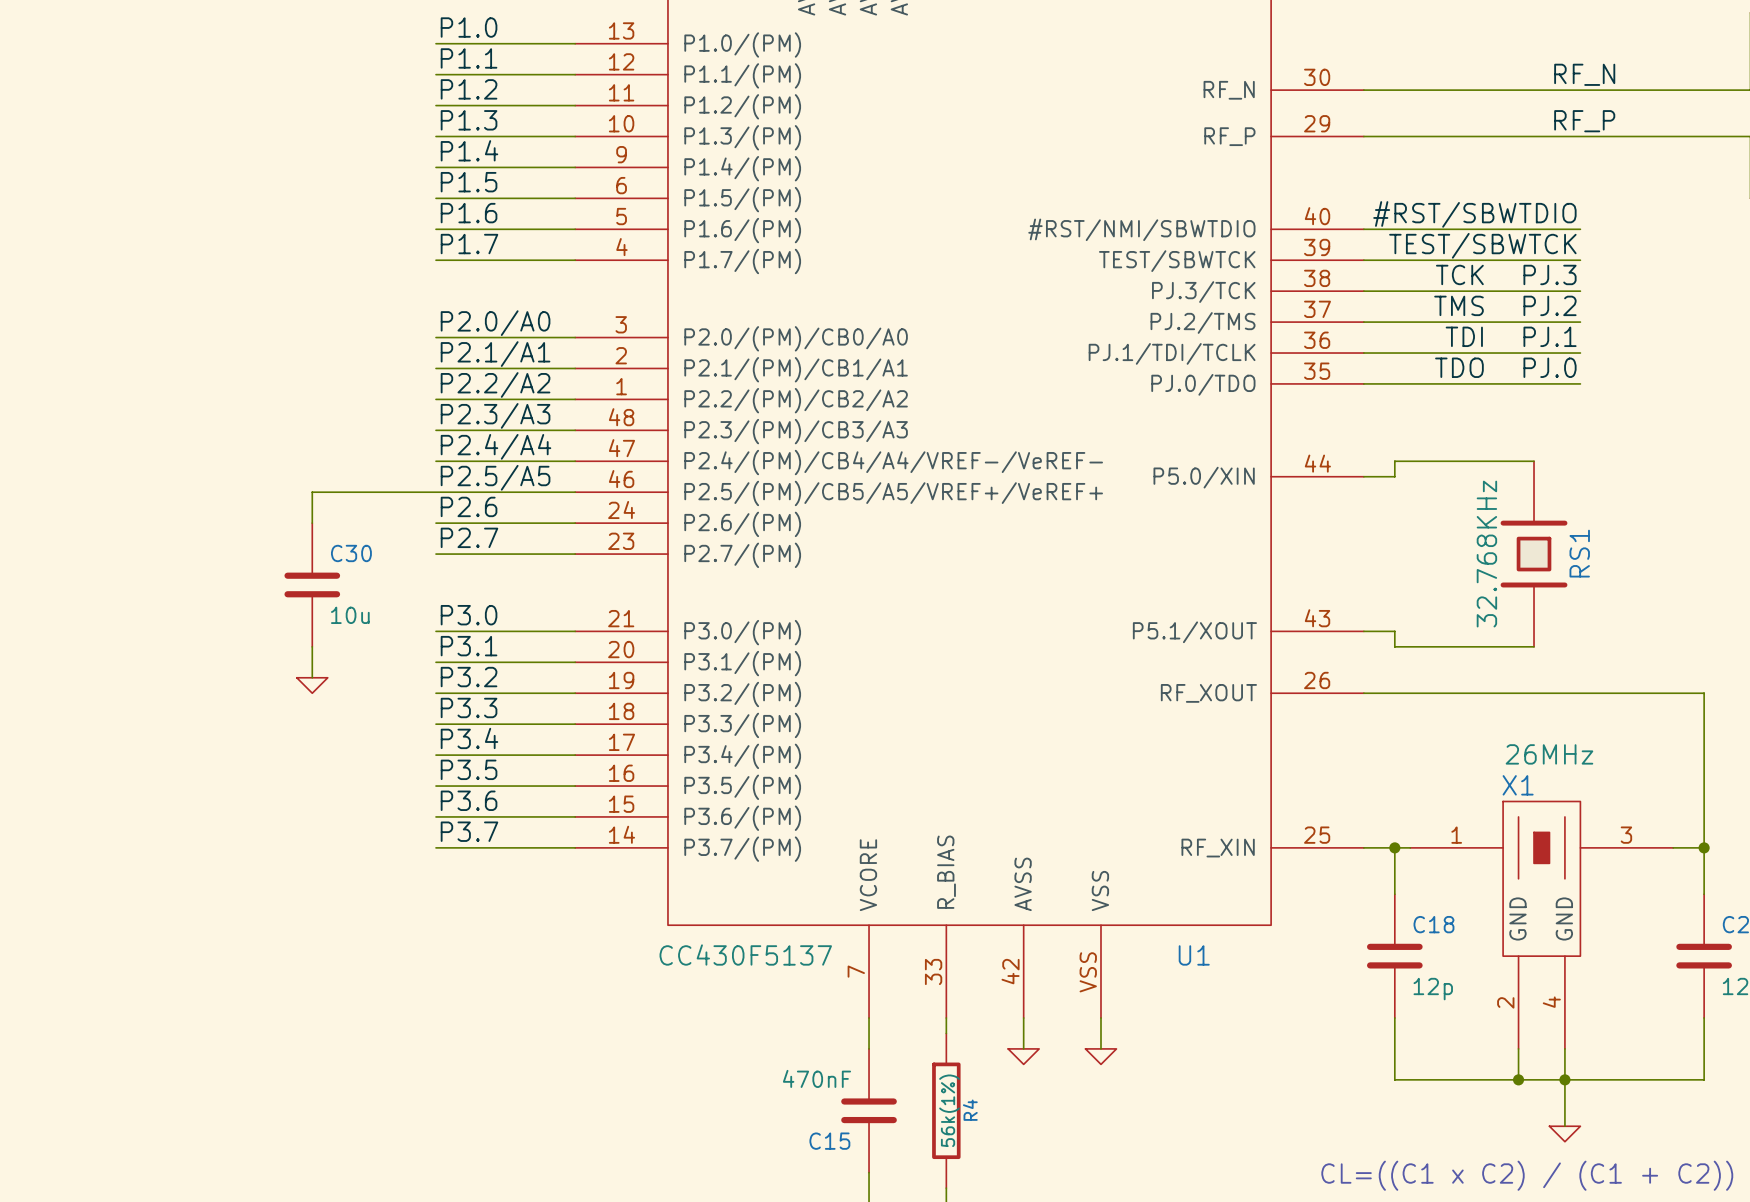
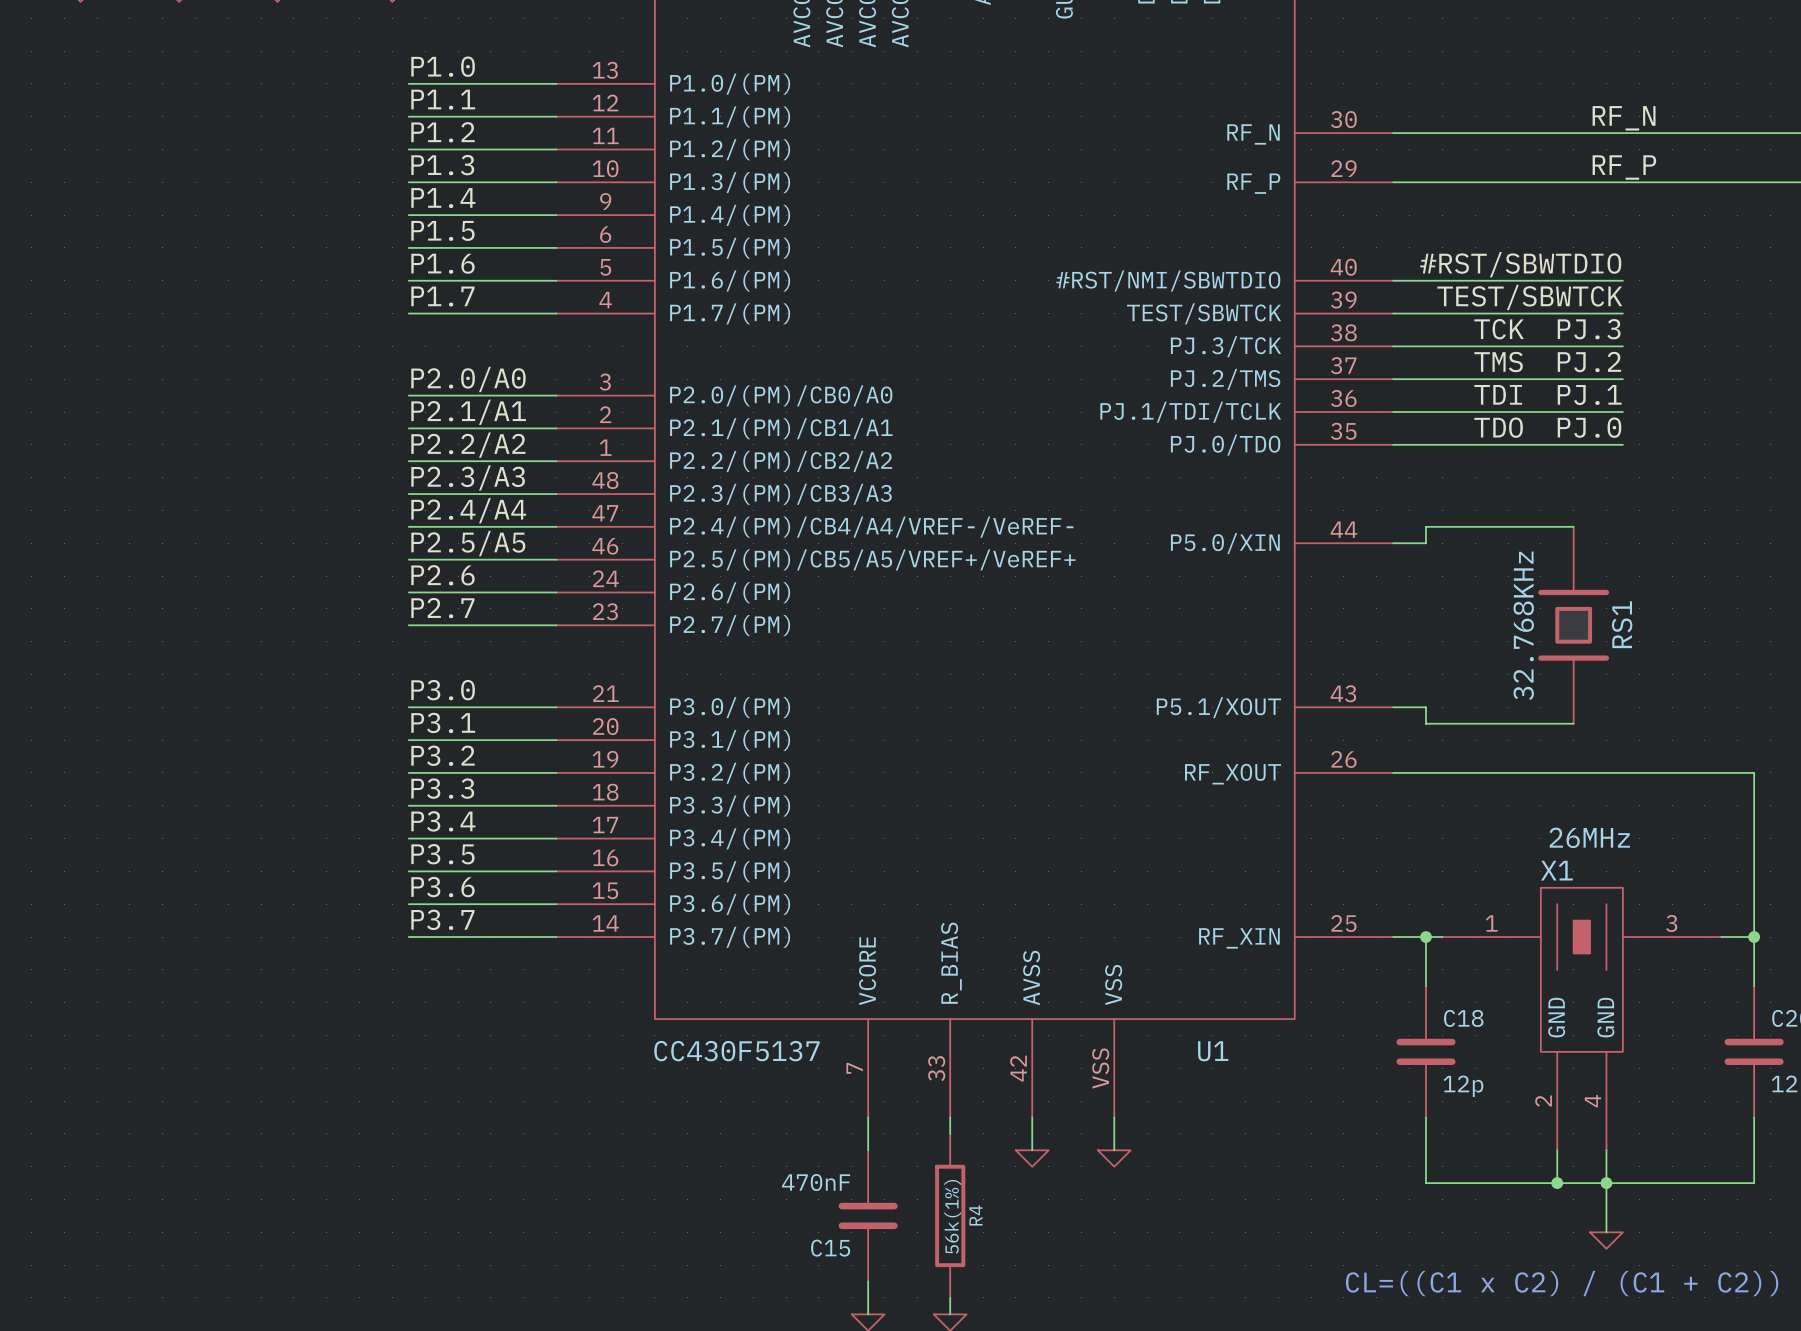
wire: (436, 492) (312, 492) (312, 523) -> none
C30: 10u (312, 584) -> none
wire: (312, 646) (312, 677) -> none
power symbol: (312, 685) -> none

